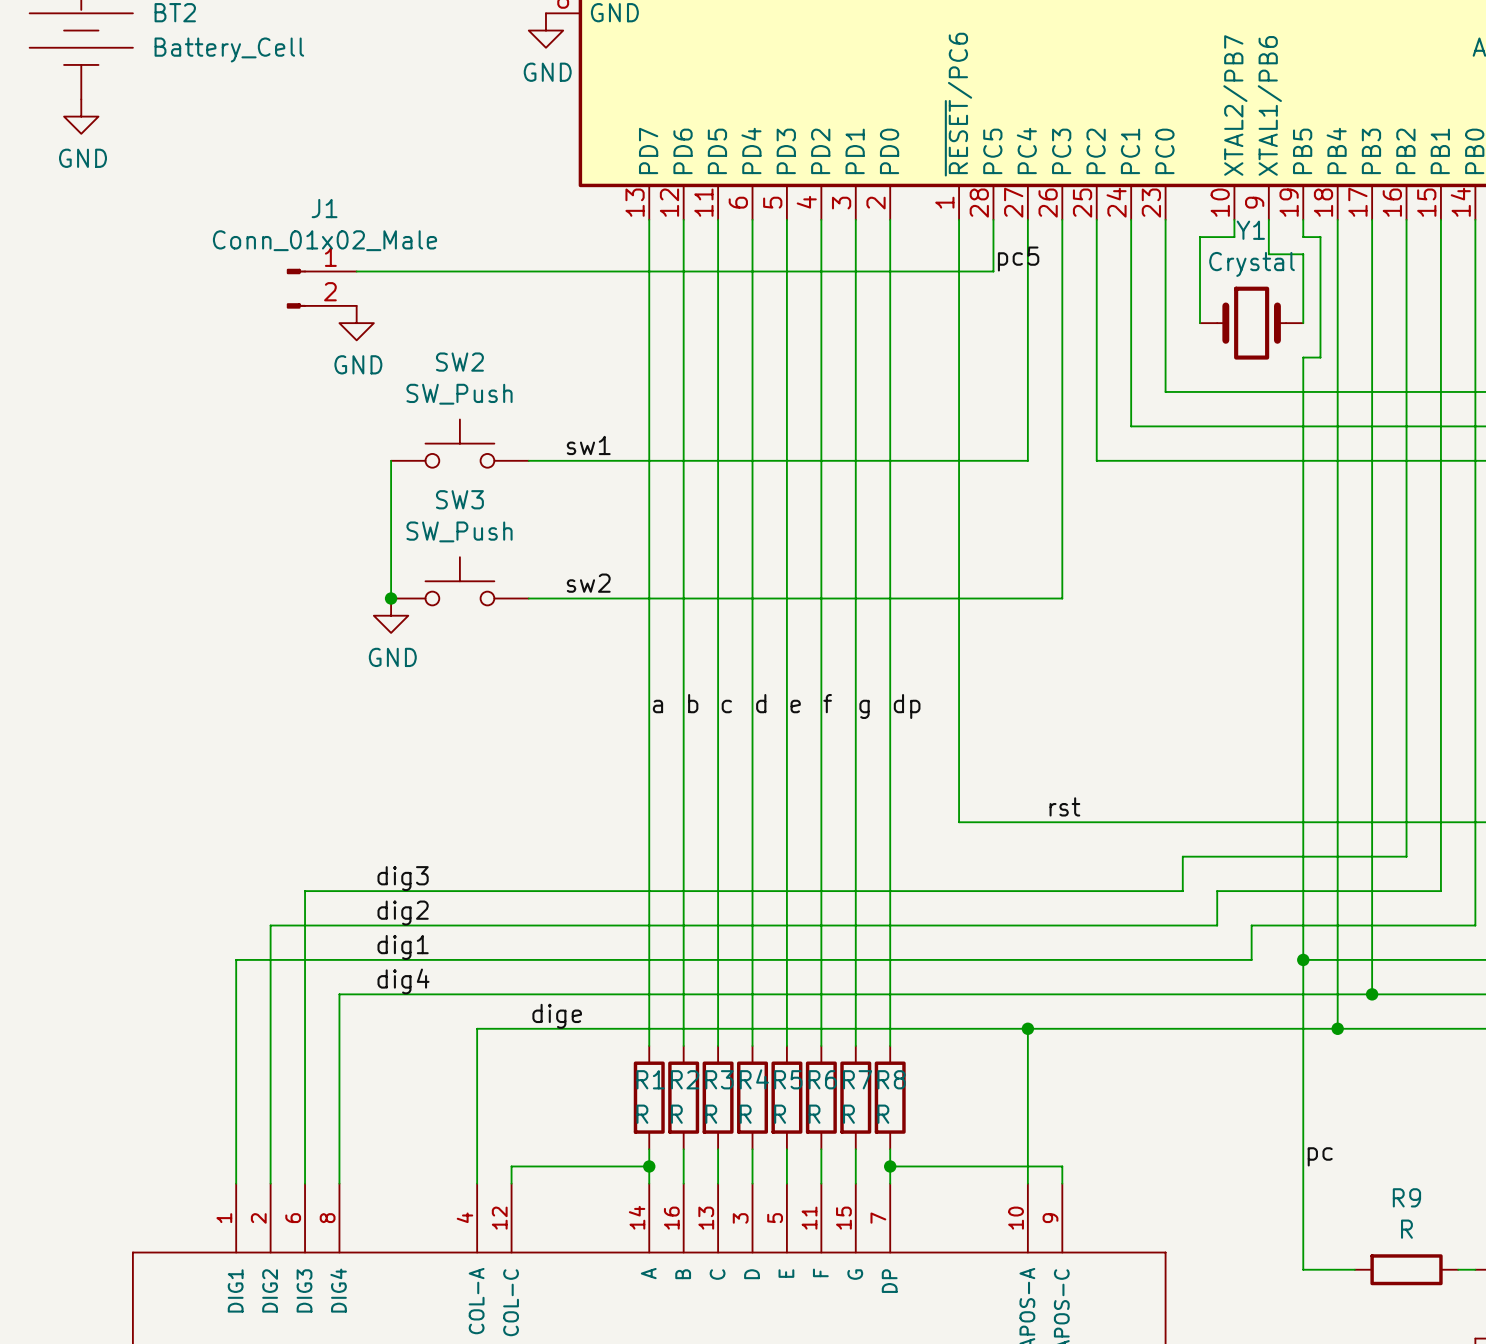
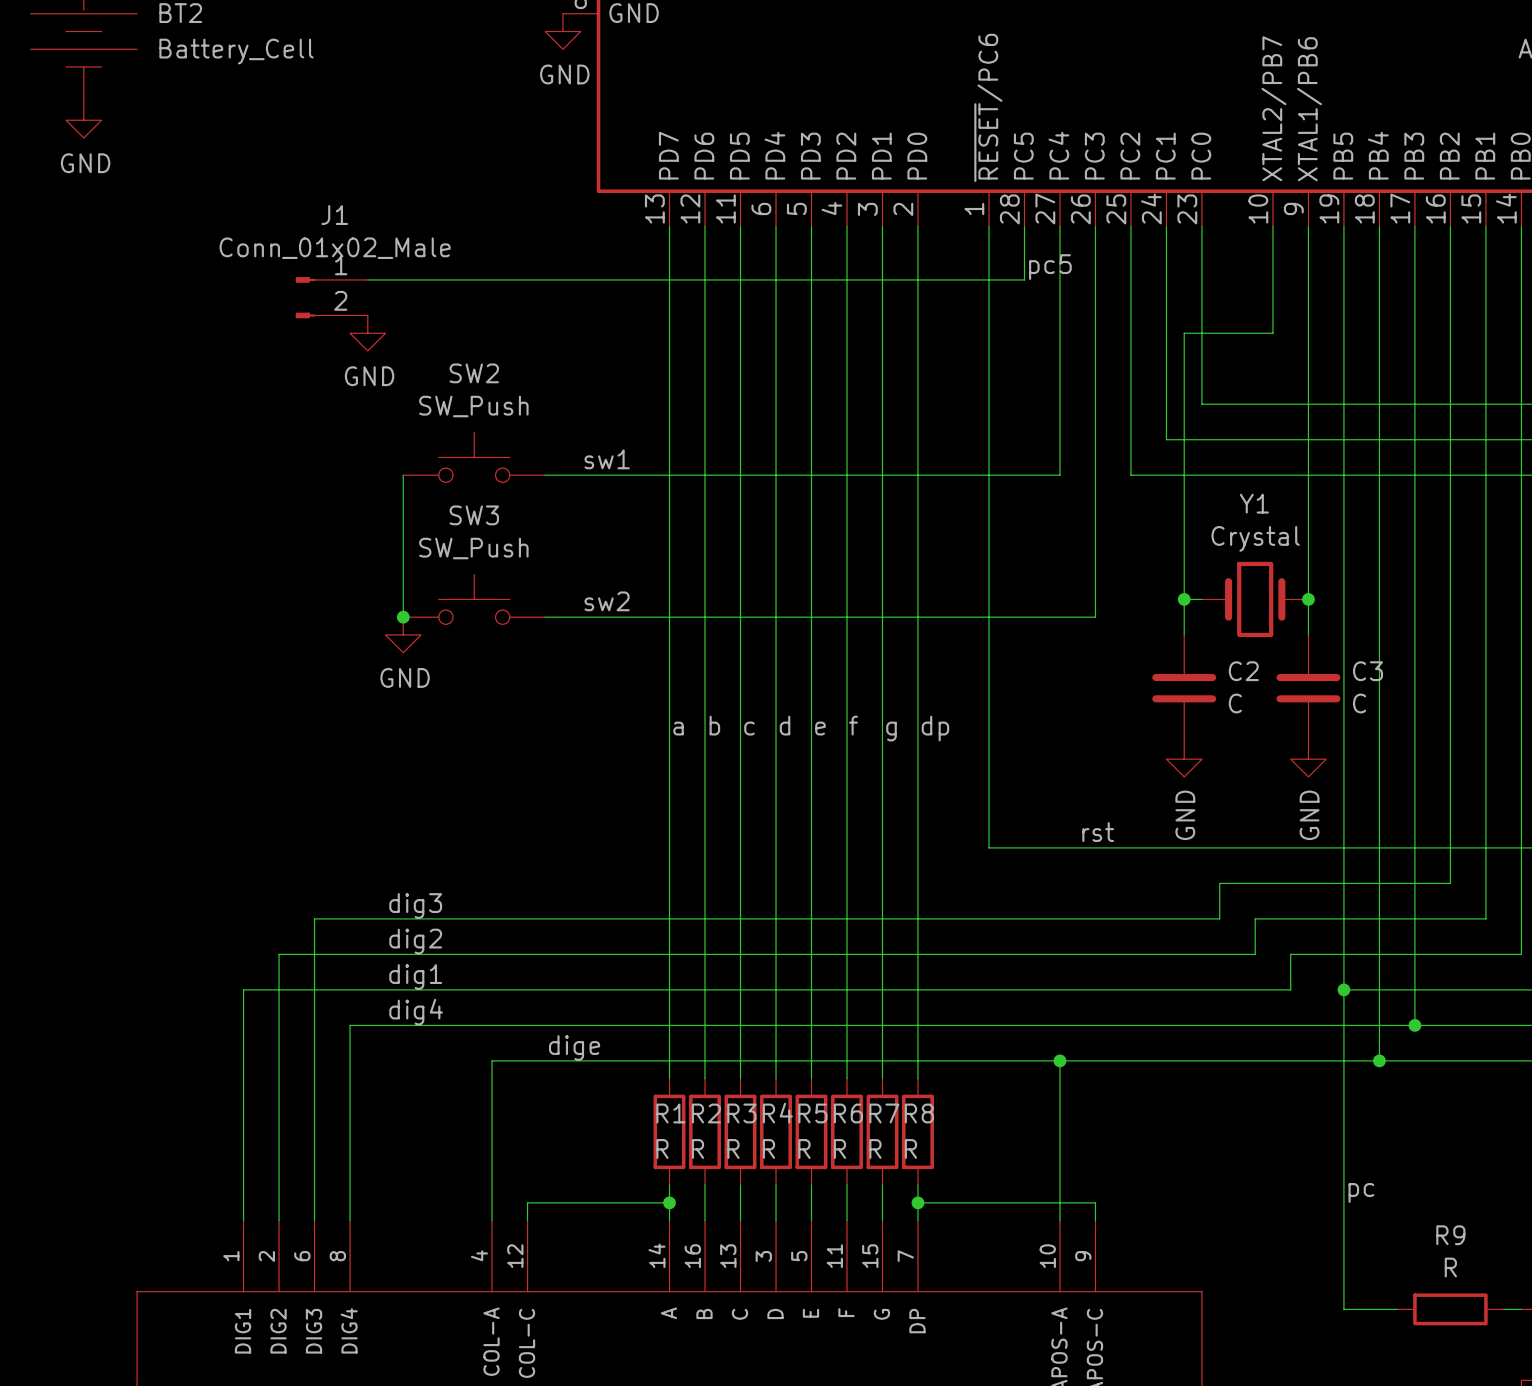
wire: (1234, 237) (1200, 237) (1200, 323) -> (1272, 244) (1272, 333) (1184, 333) (1184, 634)
wire: (1303, 237) (1320, 237) (1320, 357) (1303, 357) -> (1343, 333) (1343, 368)
wire: (1268, 254) (1303, 254) -> (1343, 244) (1343, 262)
wire: none -> (1308, 262) (1308, 634)
Y1 position: (1251, 323) -> (1255, 599)
wire: none -> (1184, 599) (1201, 599)
junction: none -> (1184, 599)
junction: none -> (1308, 599)
C2: none -> C (1184, 688)
C3: none -> C (1308, 688)
power symbol: none -> GND (1184, 759)
power symbol: none -> GND (1308, 759)

